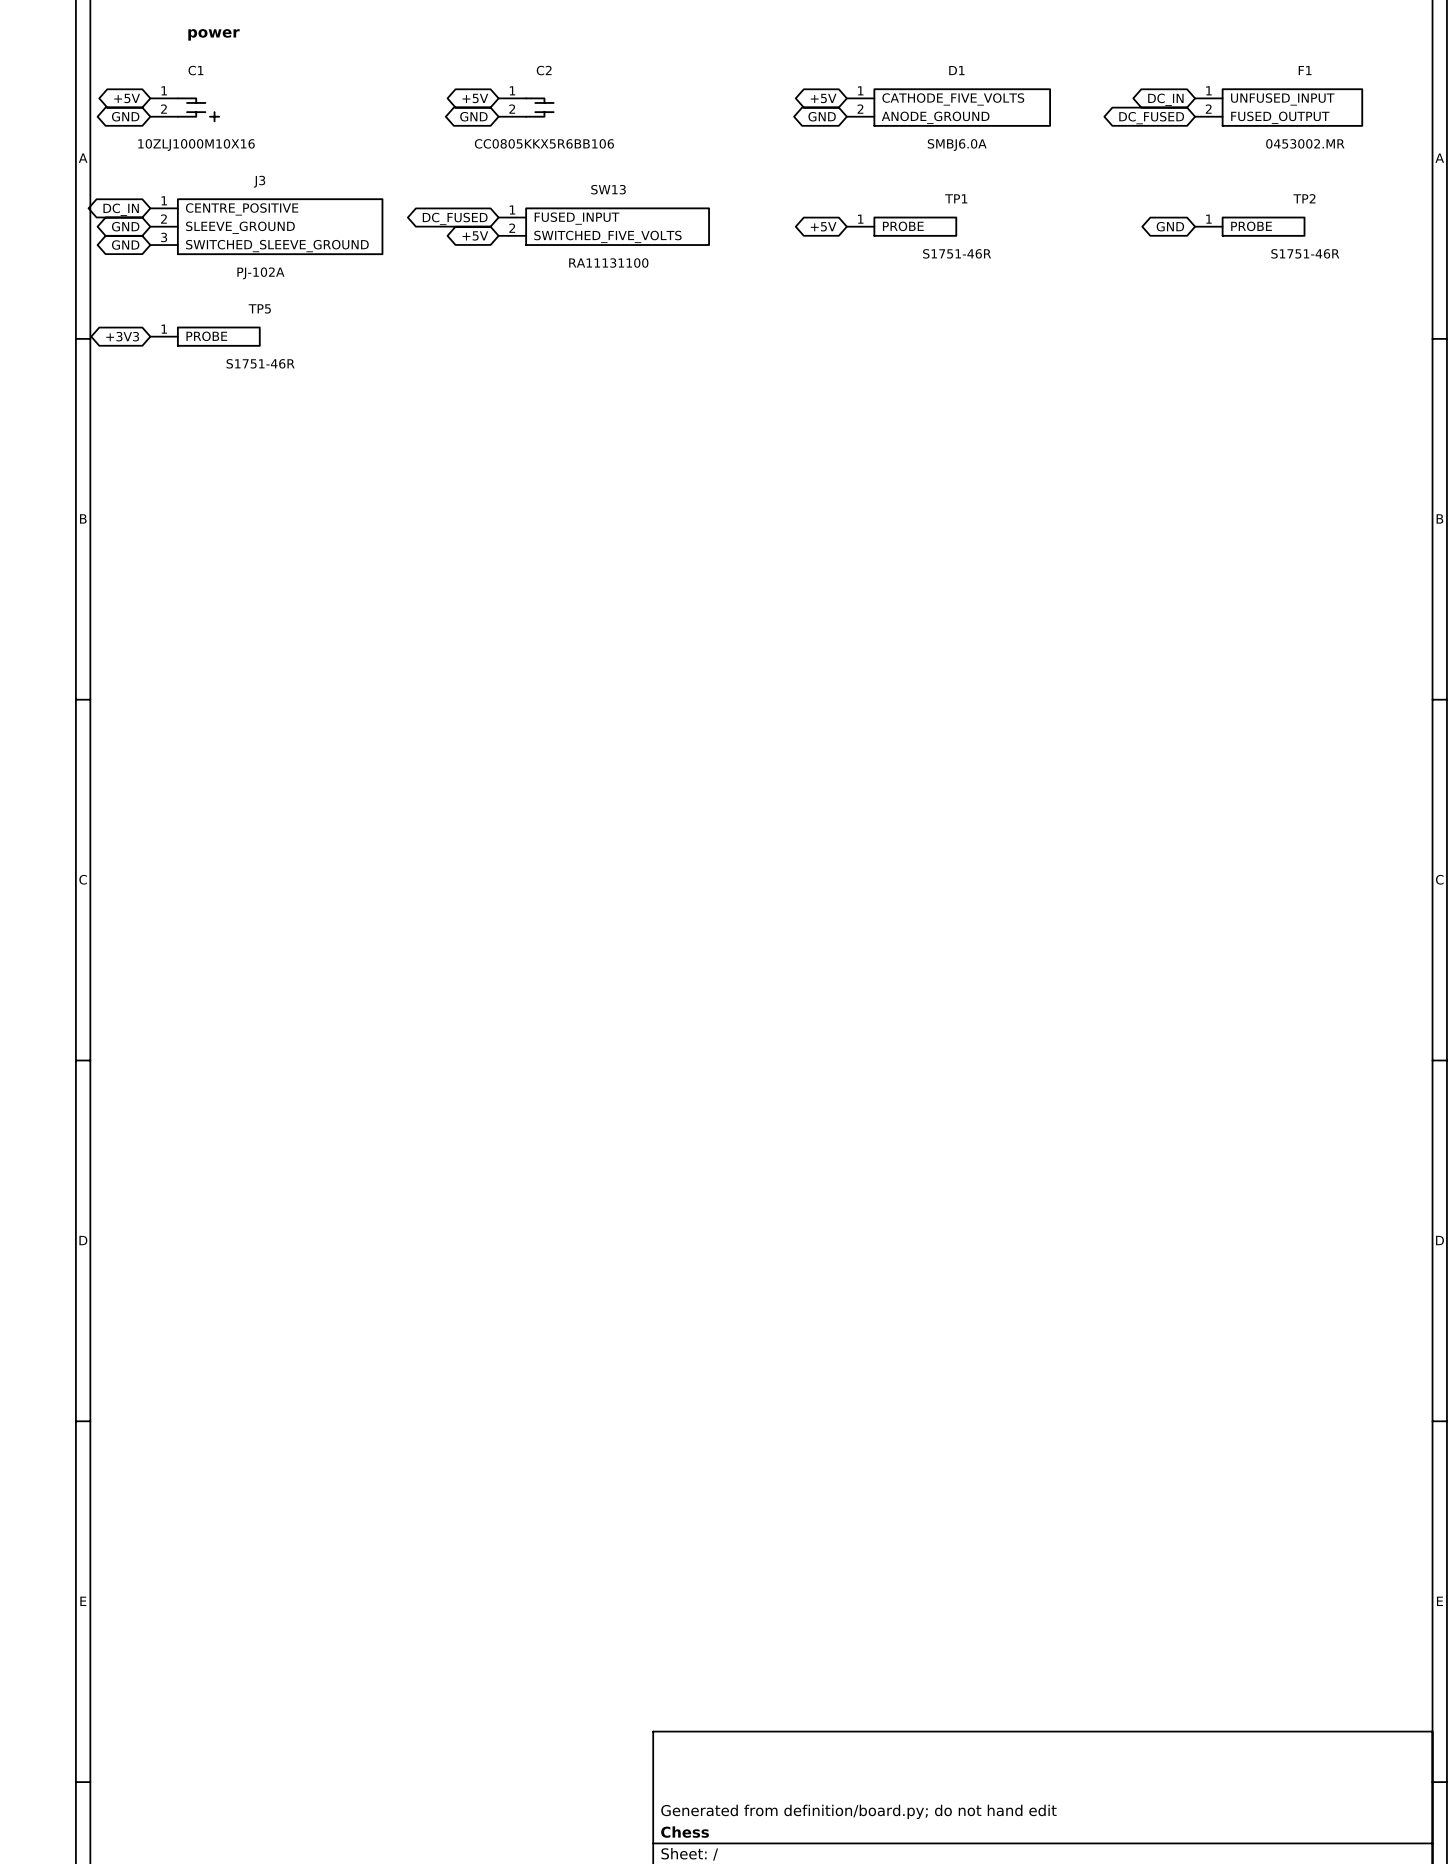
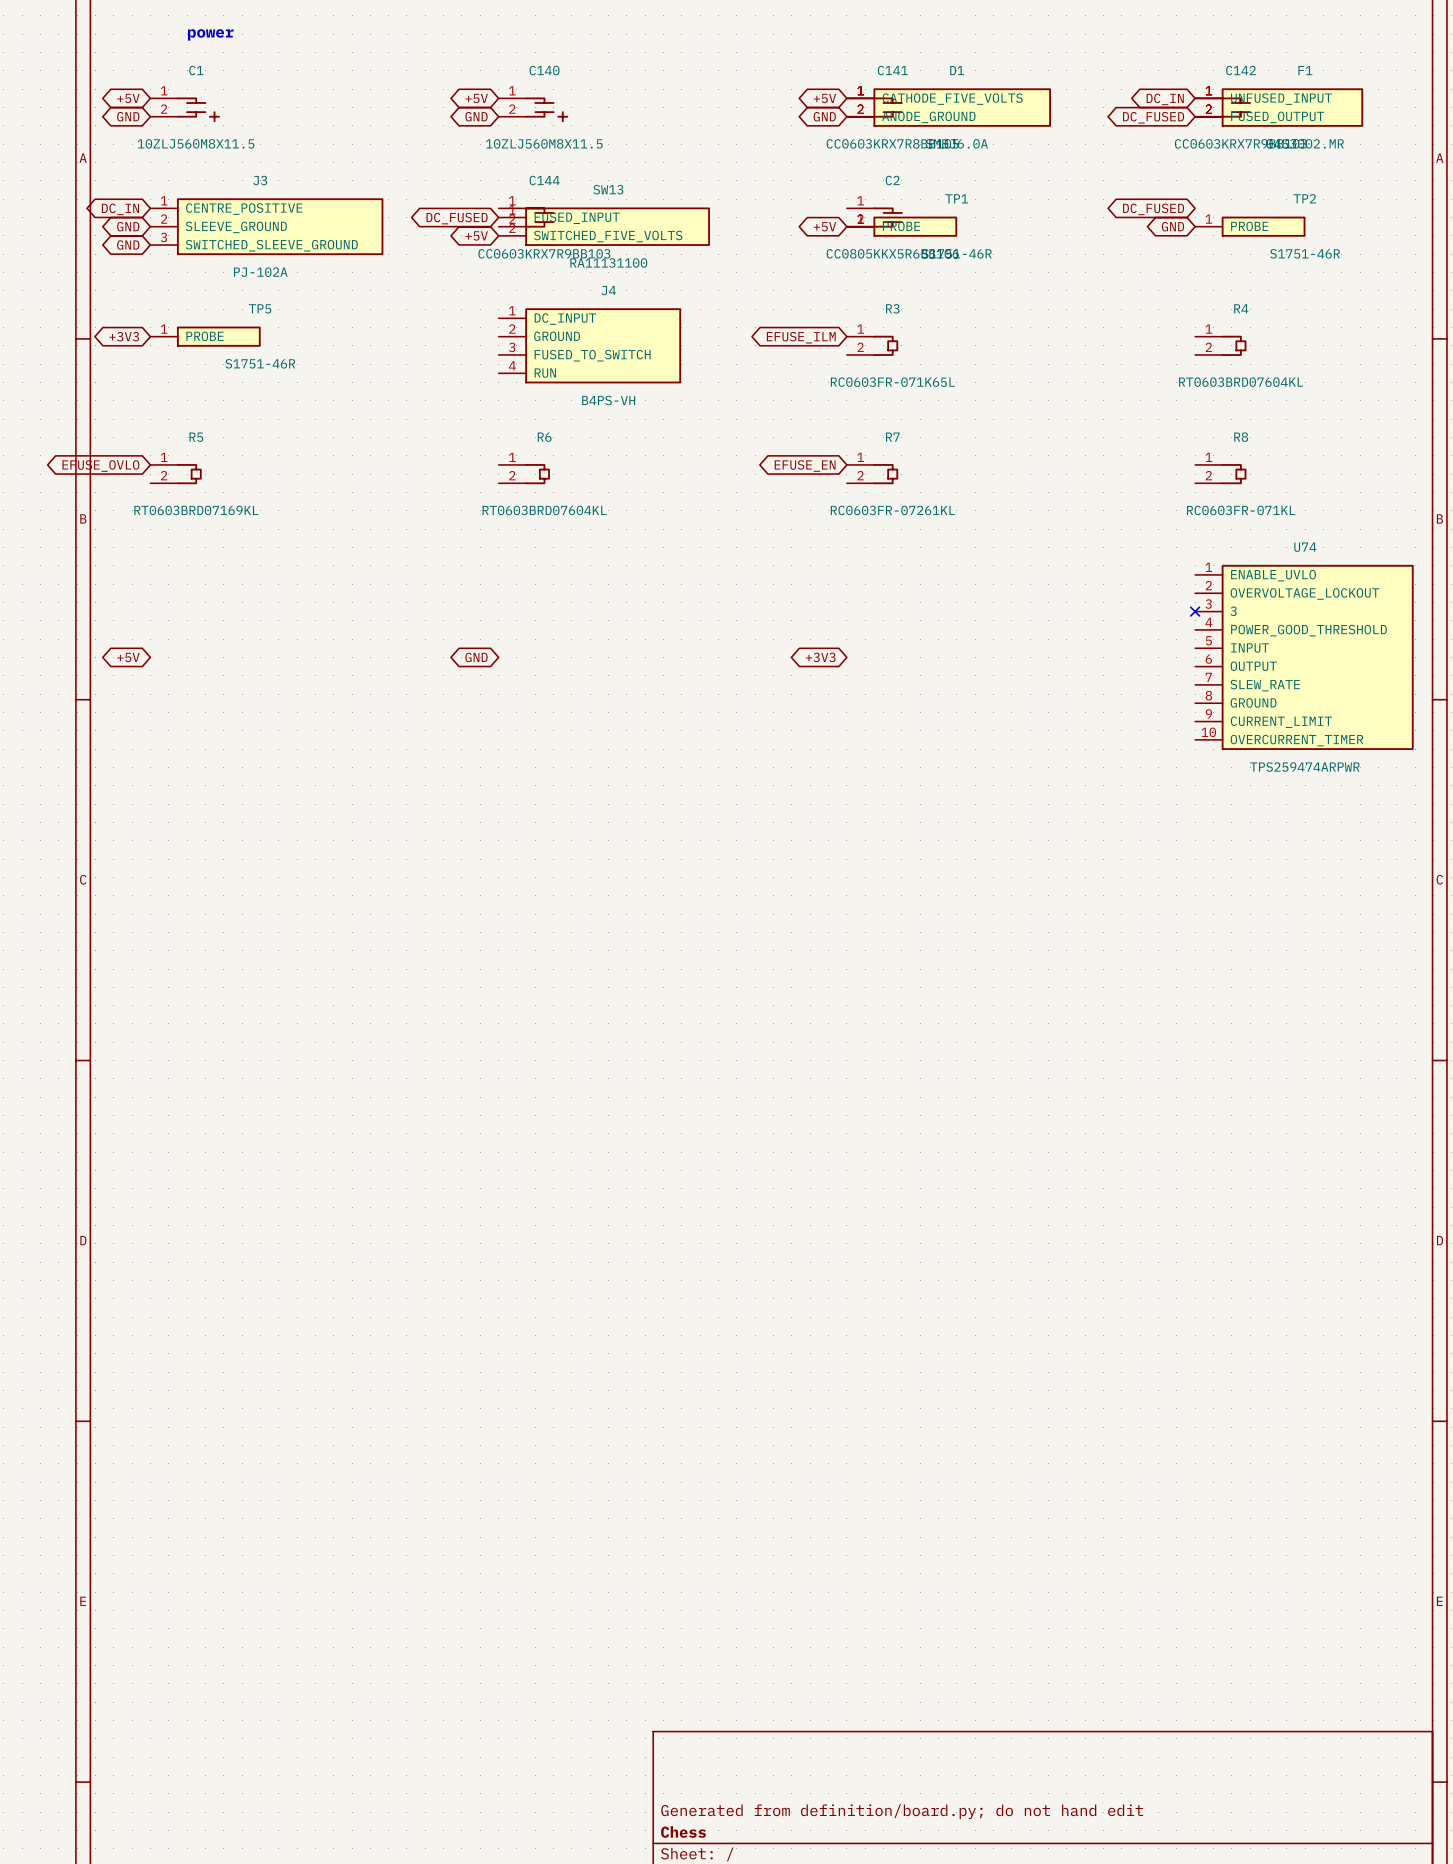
C2 position: (526, 107) -> (874, 217)
C141: none -> CC0603KRX7R8BB105 (874, 107)
C142: none -> CC0603KRX7R9BB103 (1223, 107)
C140: none -> 10ZLJ560M8X11.5 (533, 109)
C1 value: 10ZLJ1000M10X16 (196, 145) -> 10ZLJ560M8X11.5 (196, 143)
global label: none -> DC_FUSED (1153, 209)
C144: none -> CC0603KRX7R9BB103 (526, 217)
global label: none -> EFUSE_ILM (801, 337)
J4: none -> B4PS-VH (589, 345)
R3: none -> RC0603FR-071K65L (872, 345)
R4: none -> RT0603BRD07604KL (1220, 345)
global label: none -> EFUSE_OVLO (100, 465)
global label: none -> EFUSE_EN (805, 465)
R5: none -> RT0603BRD07169KL (176, 474)
R6: none -> RT0603BRD07604KL (524, 474)
R7: none -> RC0603FR-07261KL (872, 474)
R8: none -> RC0603FR-071KL (1220, 474)
no-connect mark: none -> (1195, 611)
global label: none -> +5V (128, 657)
global label: none -> GND (476, 657)
global label: none -> +3V3 (820, 657)
U74: none -> TPS259474ARPWR (1304, 657)

